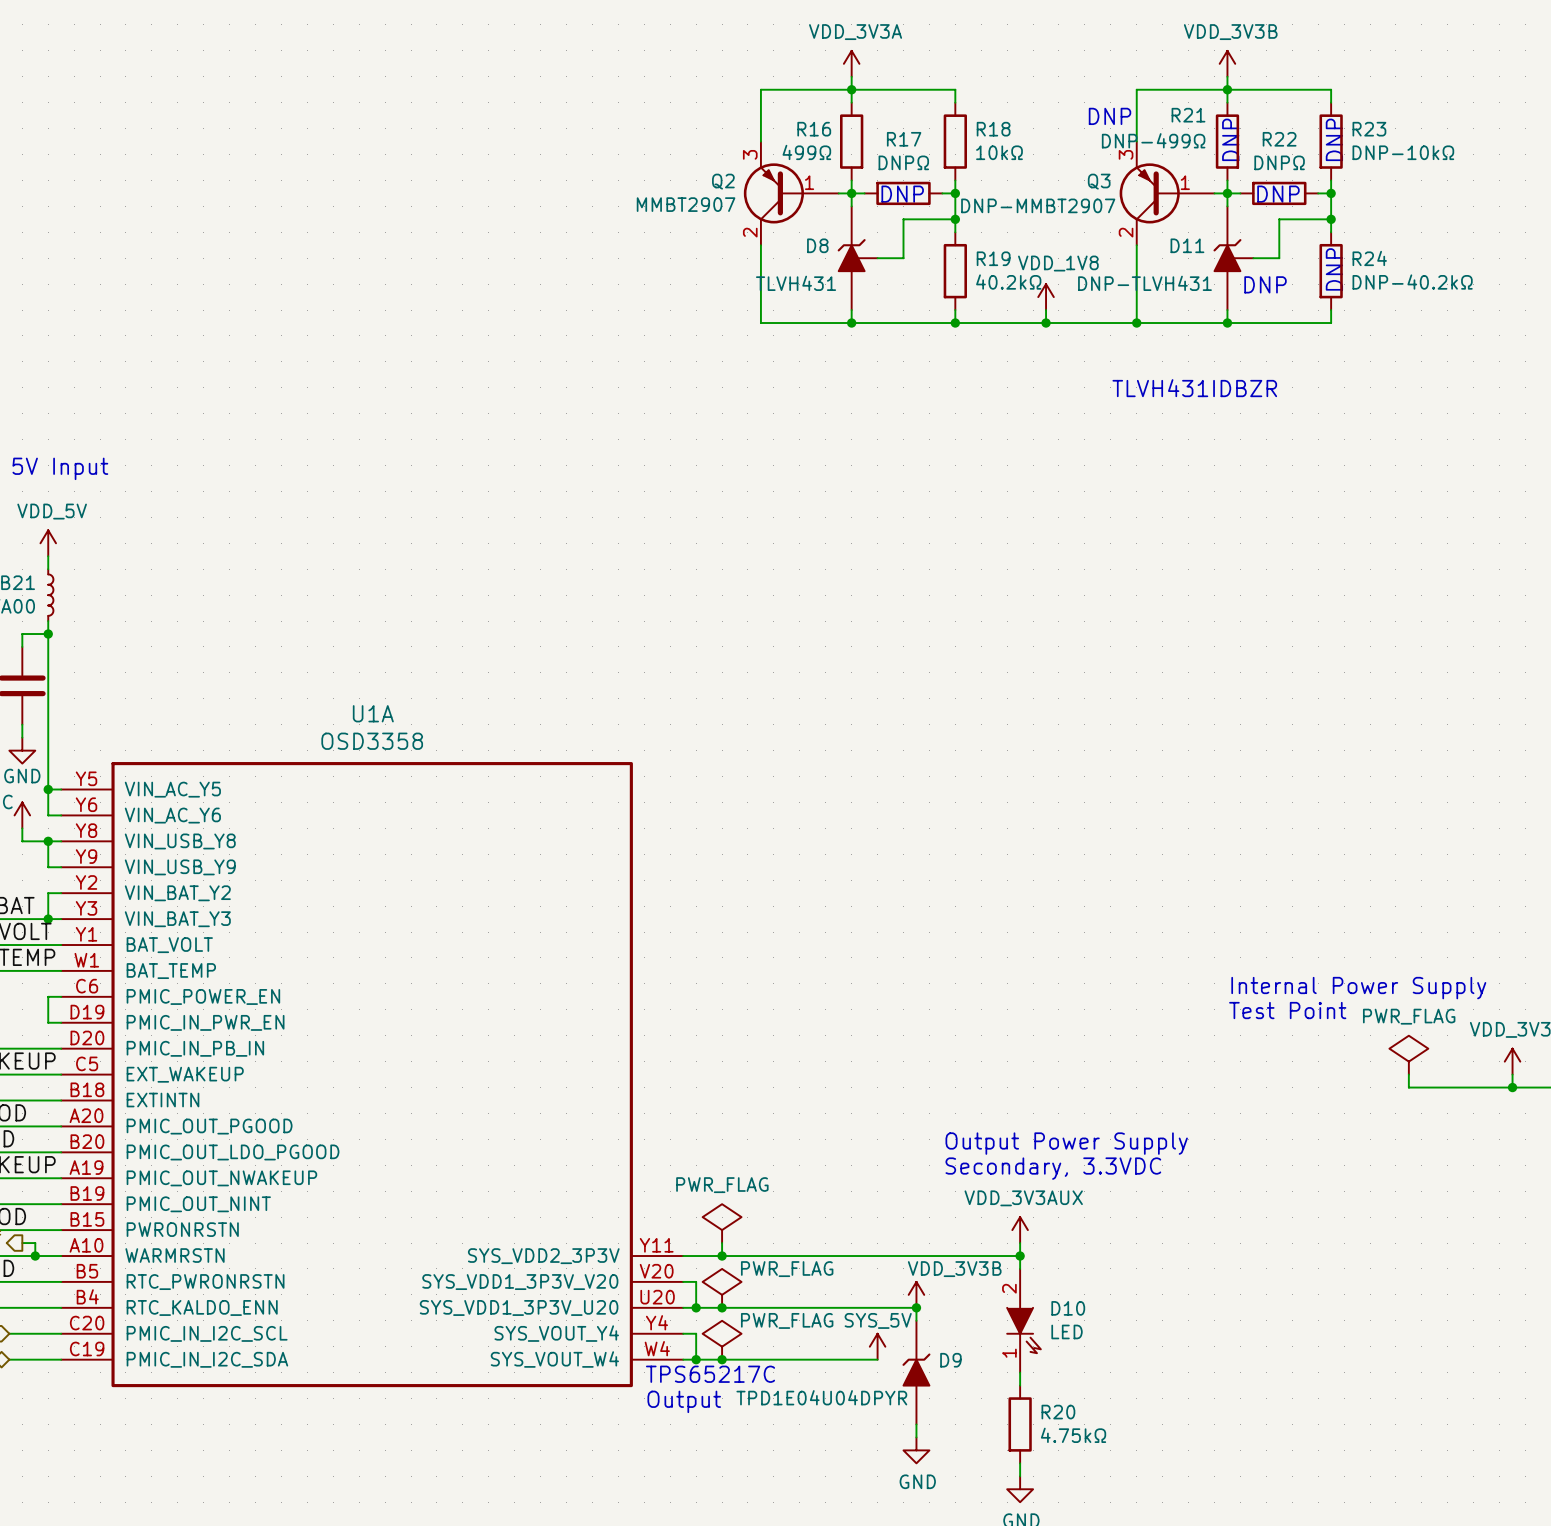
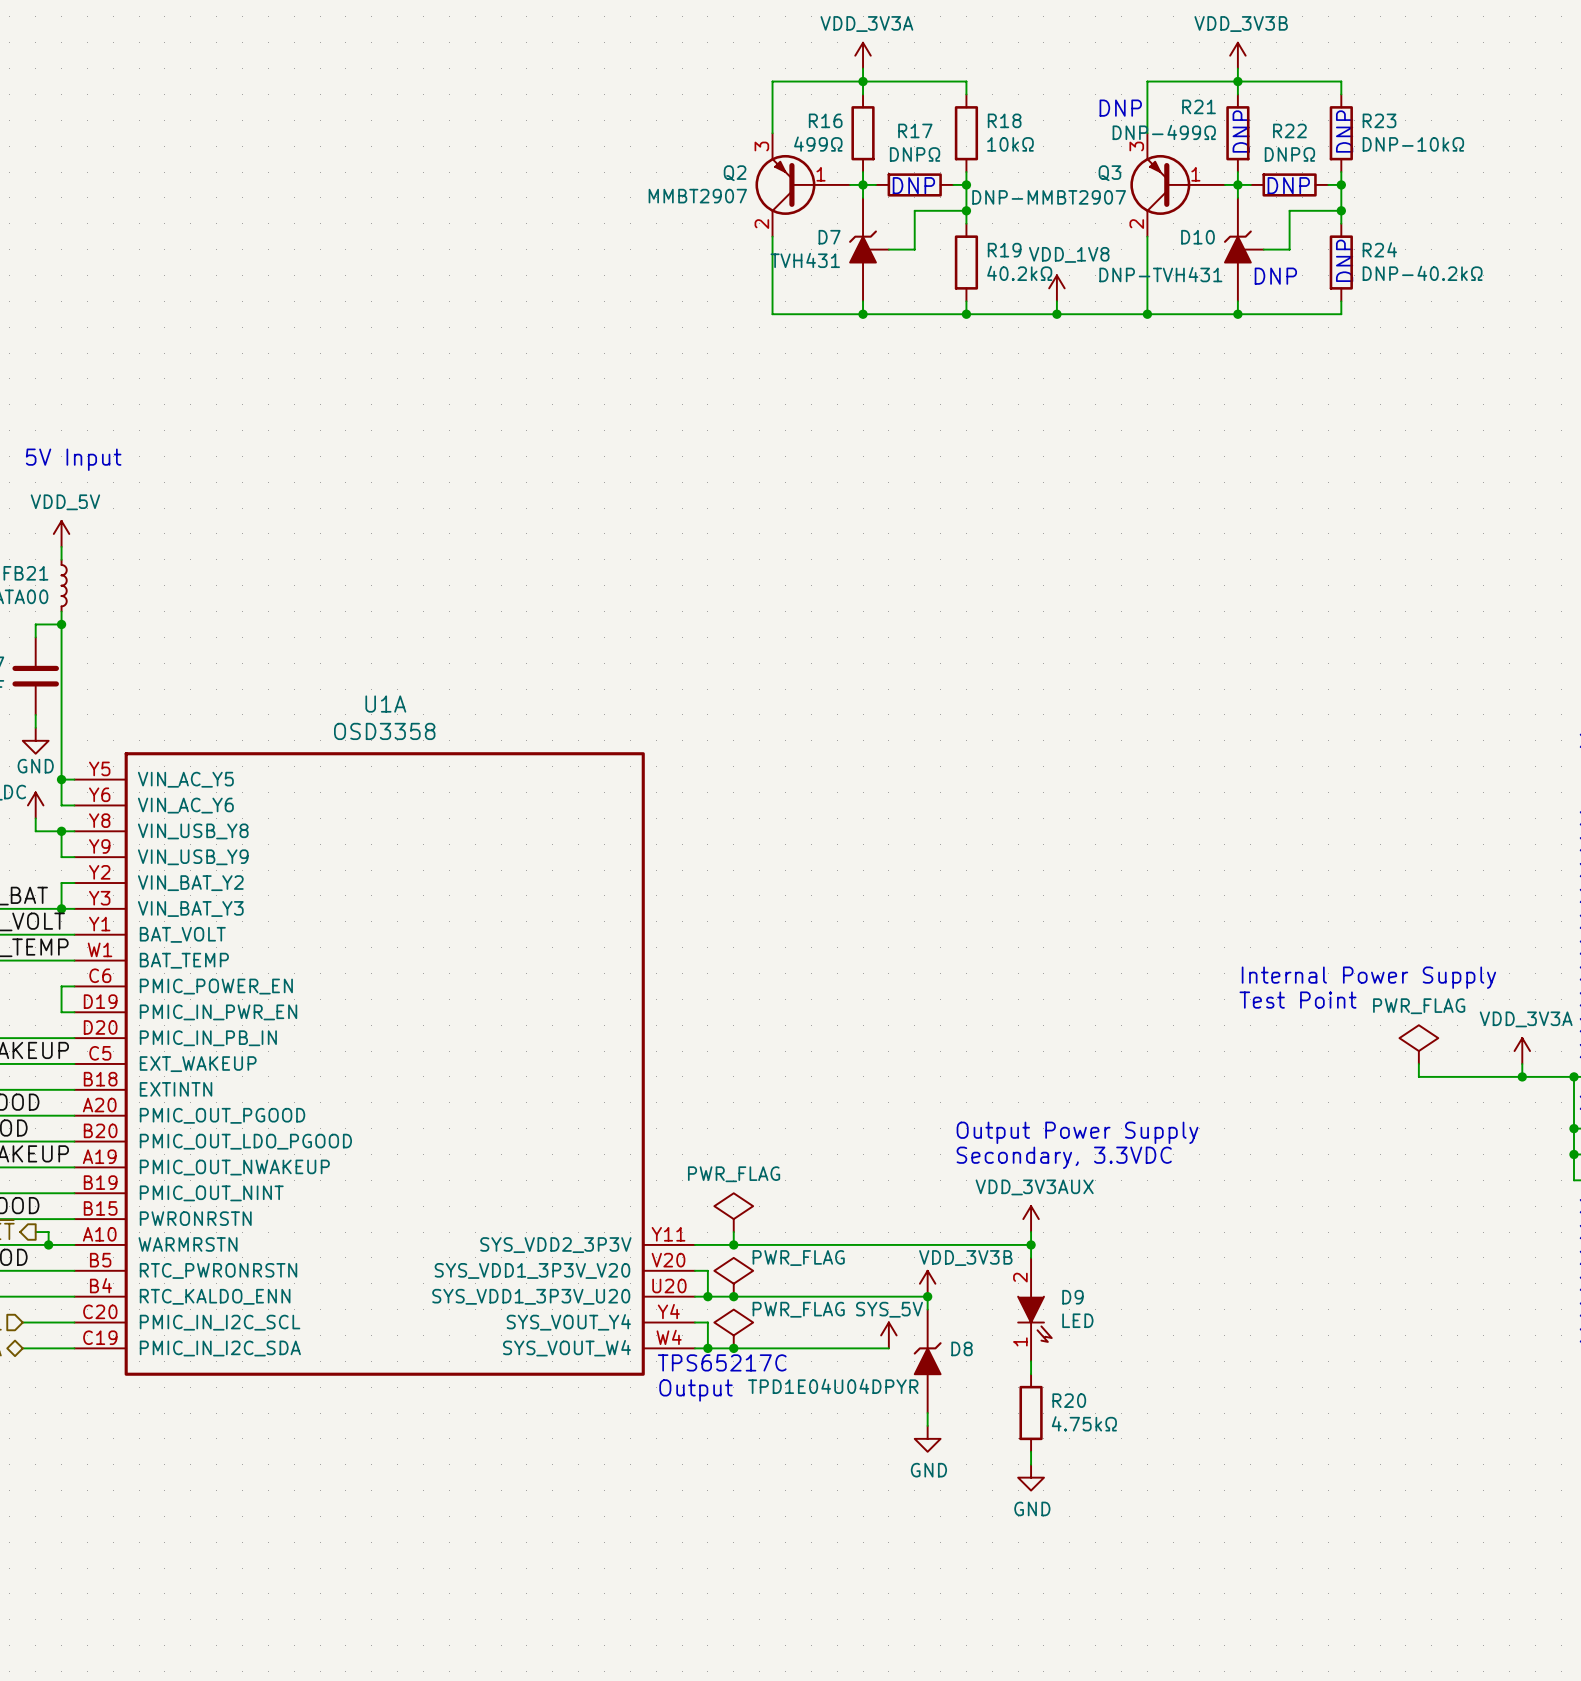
D8 name: D8 (817, 245) -> D7 (829, 237)
D11 name: D11 (1187, 245) -> D10 (1197, 237)
D8 value: TLVH431 (796, 283) -> TVH431 (805, 260)
D11 value: DNP-TLVH431 (1144, 283) -> DNP-TVH431 (1160, 274)
text: TLVH431IDBZR (1194, 388) -> none
D10 name: D10 (1068, 1308) -> D9 (1072, 1297)
D9 name: D9 (950, 1360) -> D8 (962, 1348)

